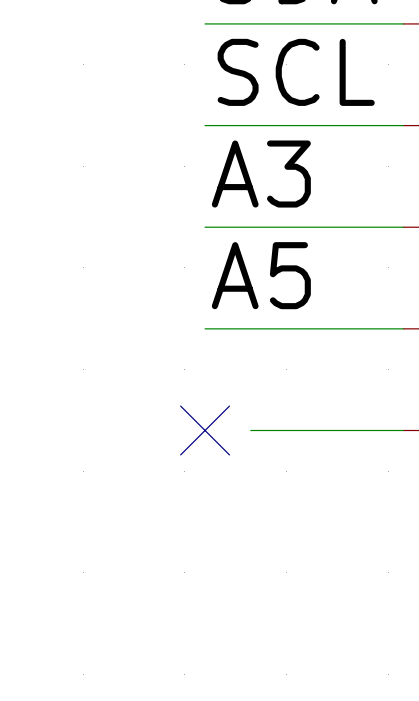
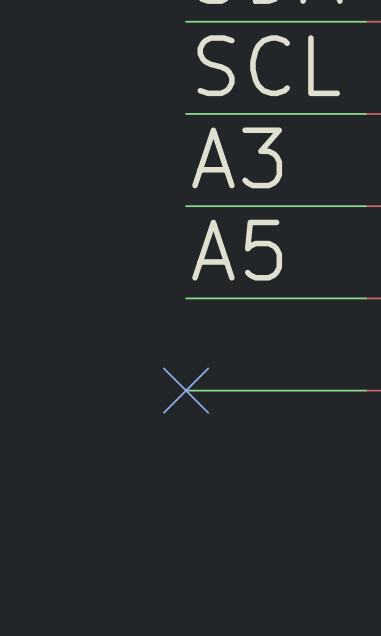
wire: none -> (186, 390) (227, 390)

